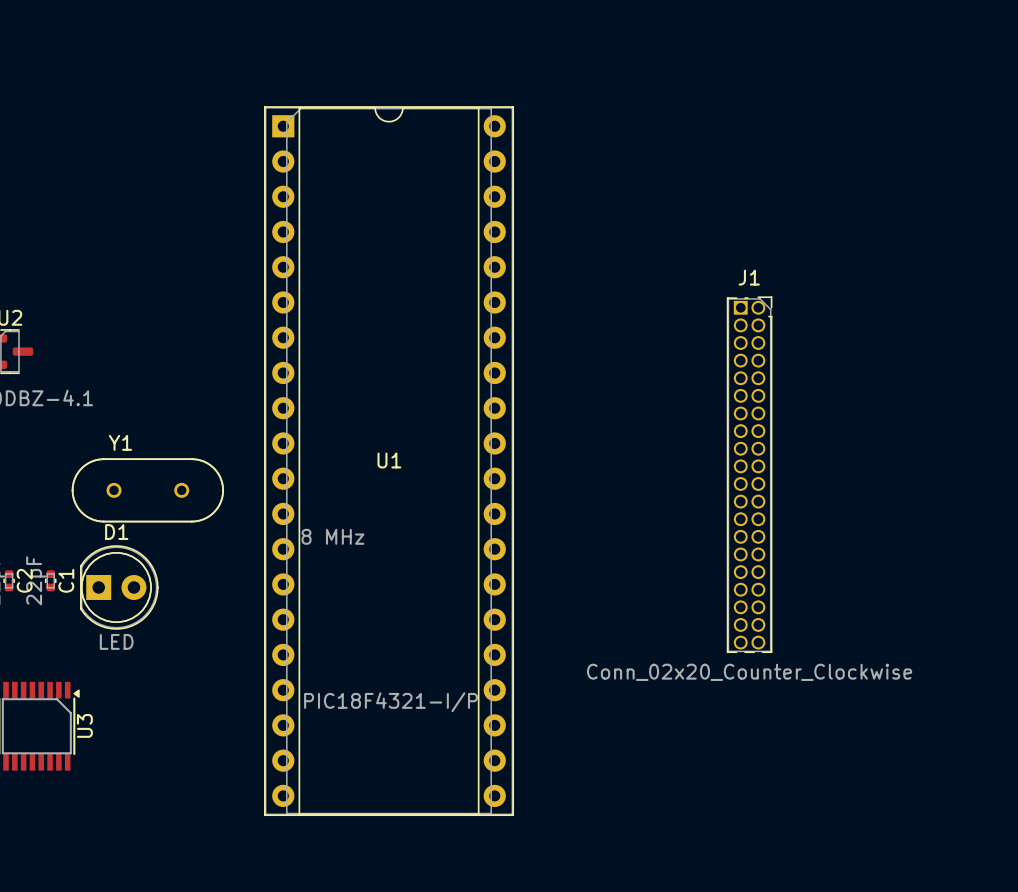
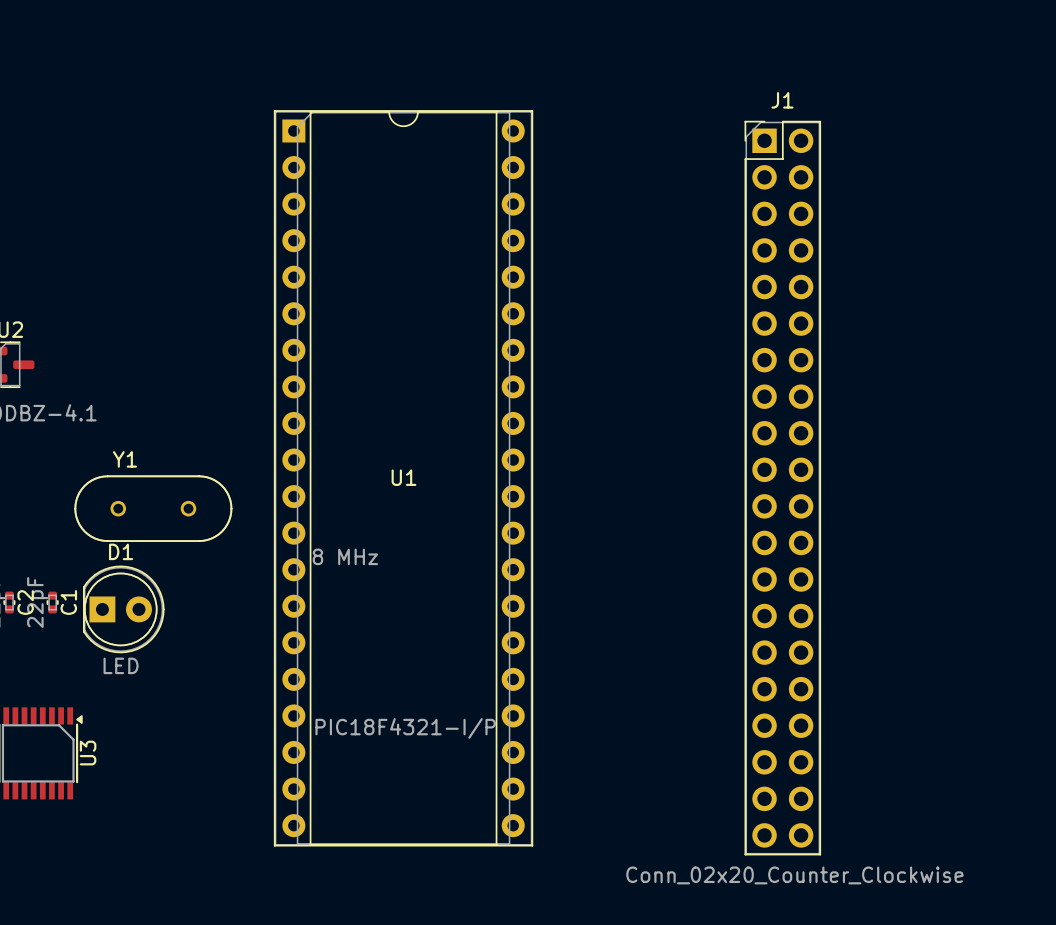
J1 name position: J1 (749, 277) -> J1 (782, 100)
J1 footprint: [726, 296, 773, 654] -> [744, 120, 822, 856]
J1 value position: Conn_02x20_Counter_Clockwise (749, 672) -> Conn_02x20_Counter_Clockwise (794, 875)

